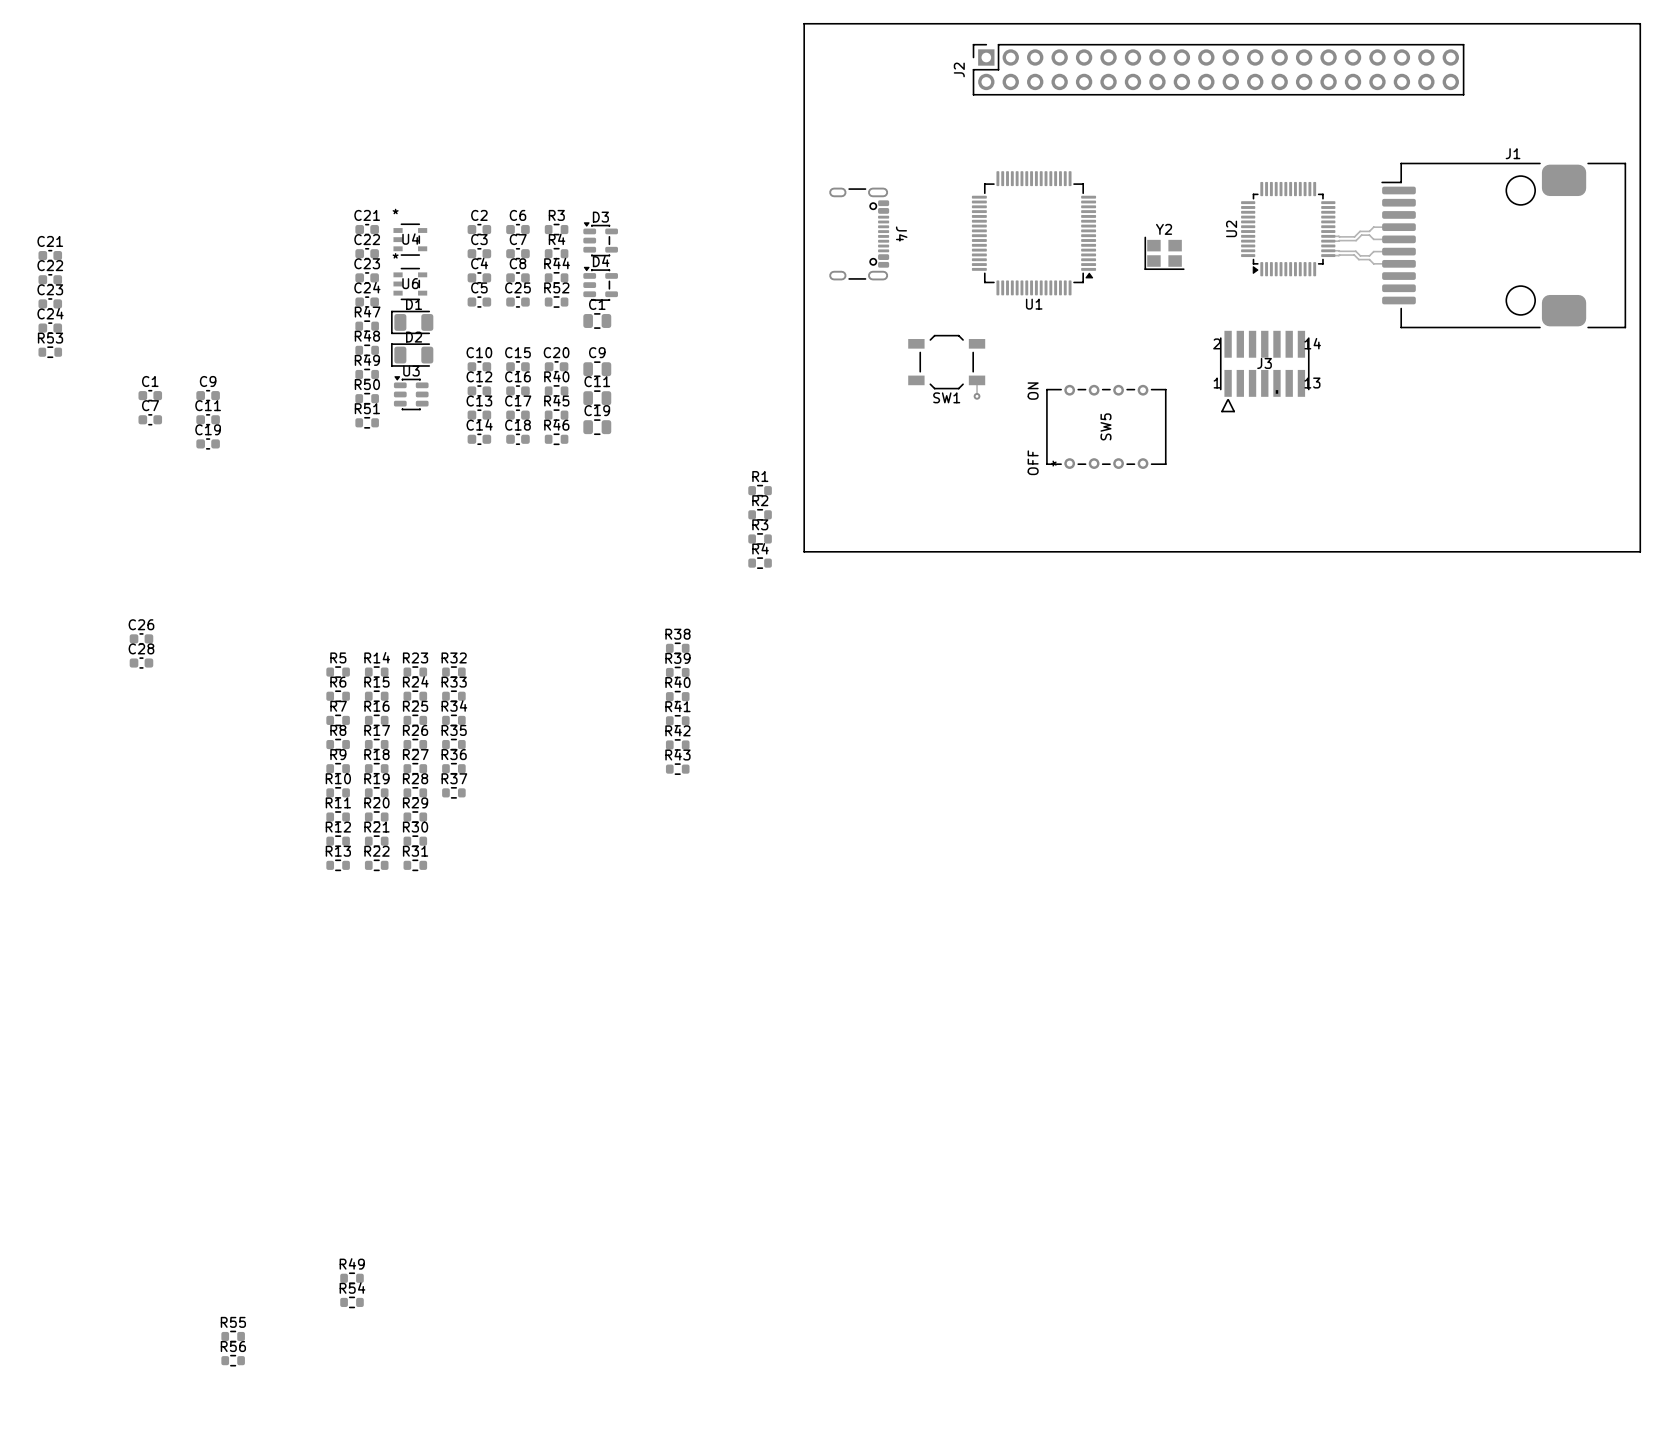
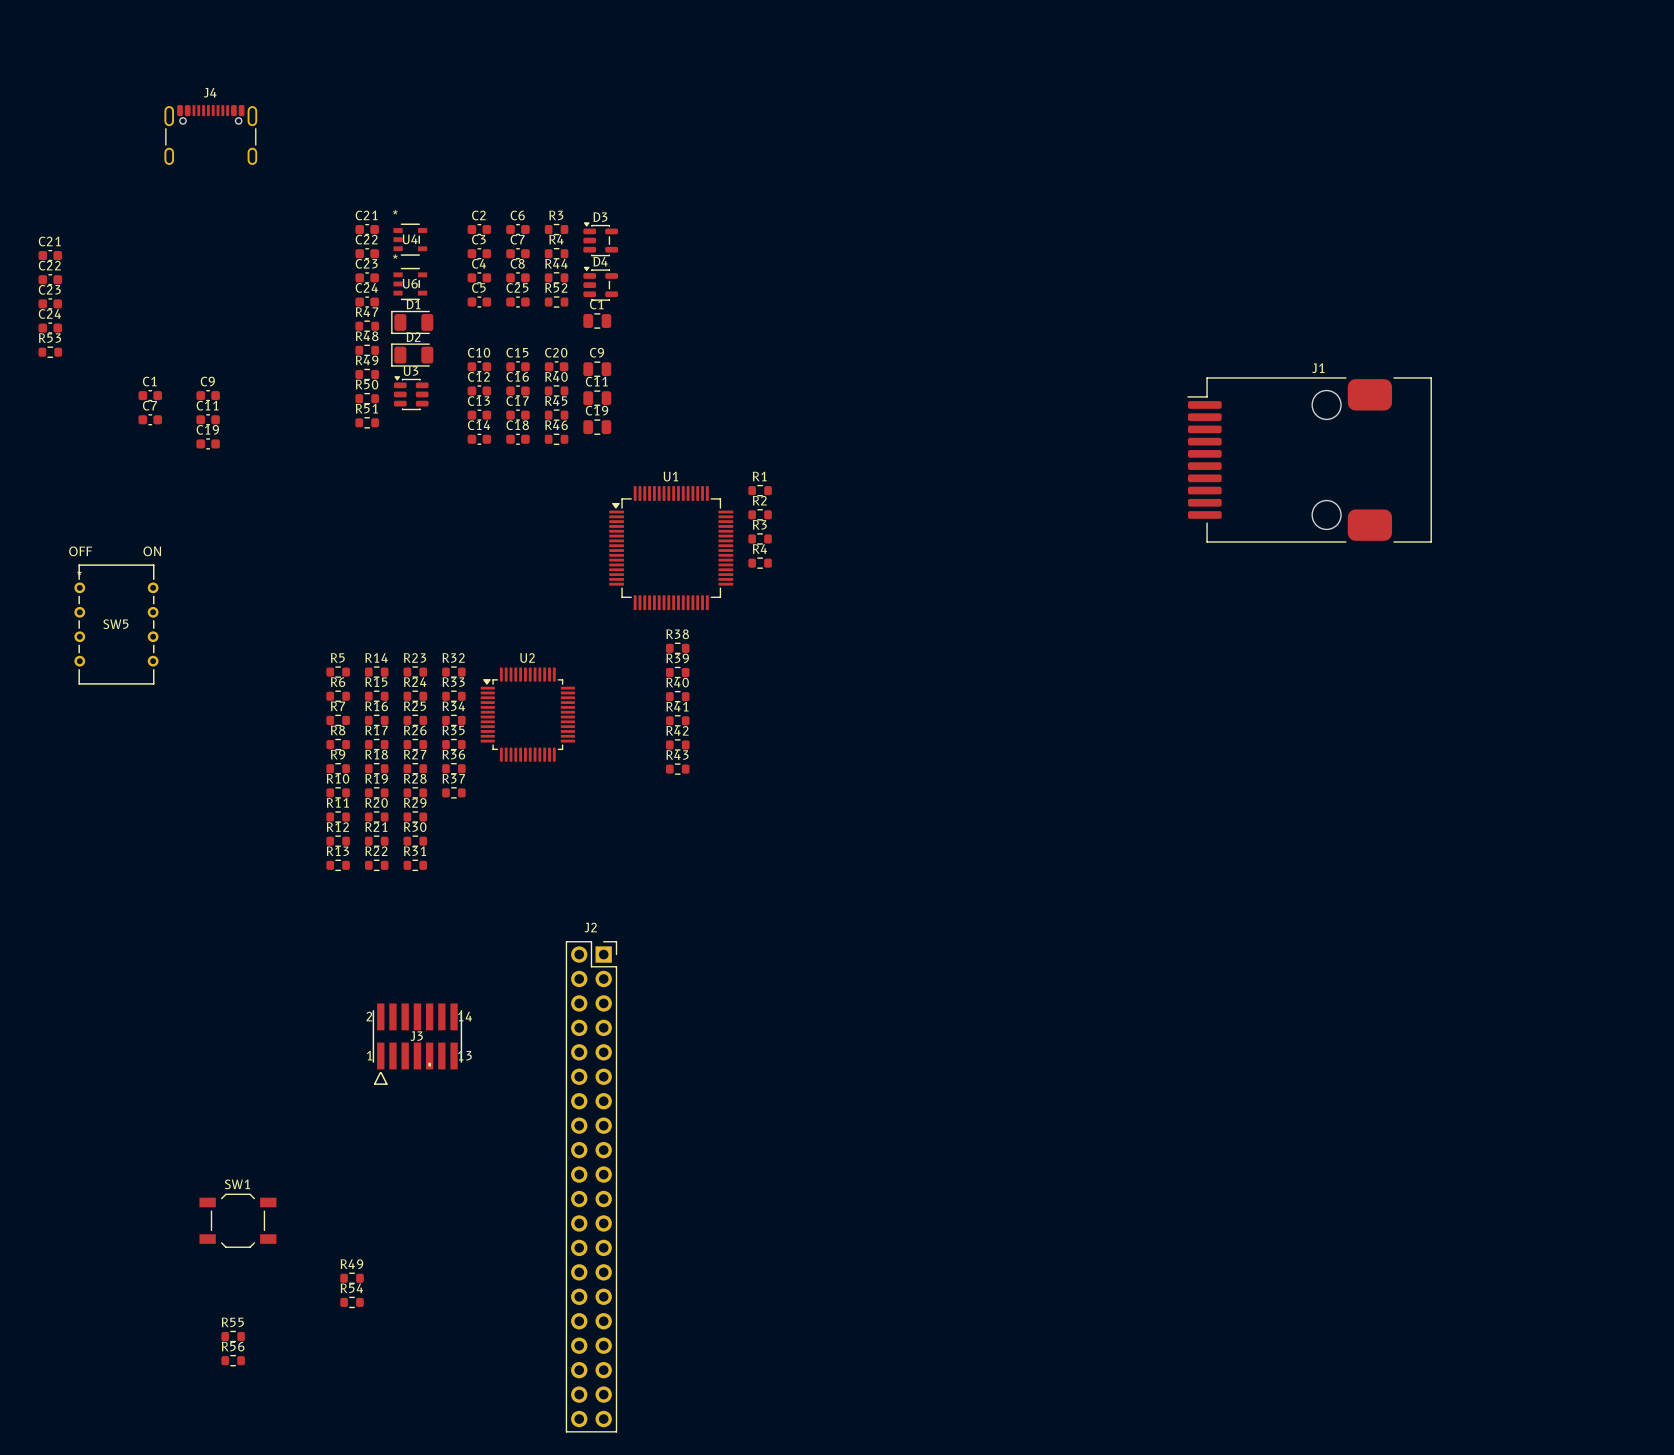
board edge: (804, 23) (1640, 23) (1640, 551) (804, 551) (804, 23) -> none
J2 rotation: 0° (1218, 69) -> 90° clockwise (591, 1186)
J2 position: (1218, 69) -> (591, 1186)
track: (1398, 227) (1373, 227) (1369, 231) (1360, 231) (1354, 236) (1328, 236) -> none
U2 rotation: 0° (1288, 229) -> 90° clockwise (527, 714)
U2 position: (1288, 229) -> (527, 714)
U1 rotation: 0° (1033, 233) -> 180° (671, 548)
U1 position: (1033, 233) -> (671, 548)
J4 rotation: 0° (859, 234) -> 90° counterclockwise (210, 135)
J4 position: (859, 234) -> (210, 135)
track: (1398, 239) (1373, 239) (1369, 235) (1361, 235) (1356, 240) (1328, 241) -> none
J1 position: (1503, 245) -> (1309, 459)
track: (1328, 250) (1355, 251) (1360, 255) (1369, 255) (1373, 251) (1398, 251) -> none
Y2: (1164, 253) -> none
track: (1328, 255) (1354, 255) (1358, 259) (1369, 259) (1373, 263) (1398, 263) -> none
SW1 position: (946, 362) -> (237, 1220)
J3 position: (1264, 371) -> (417, 1044)
track: (977, 380) (977, 396) -> none
via: (977, 396) -> none
SW1 name position: SW1 (946, 397) -> SW1 (237, 1184)
SW5 rotation: 0° (1106, 426) -> 90° clockwise (116, 624)
SW5 position: (1106, 426) -> (116, 624)
C26: (141, 638) -> none
C28: (141, 663) -> none

